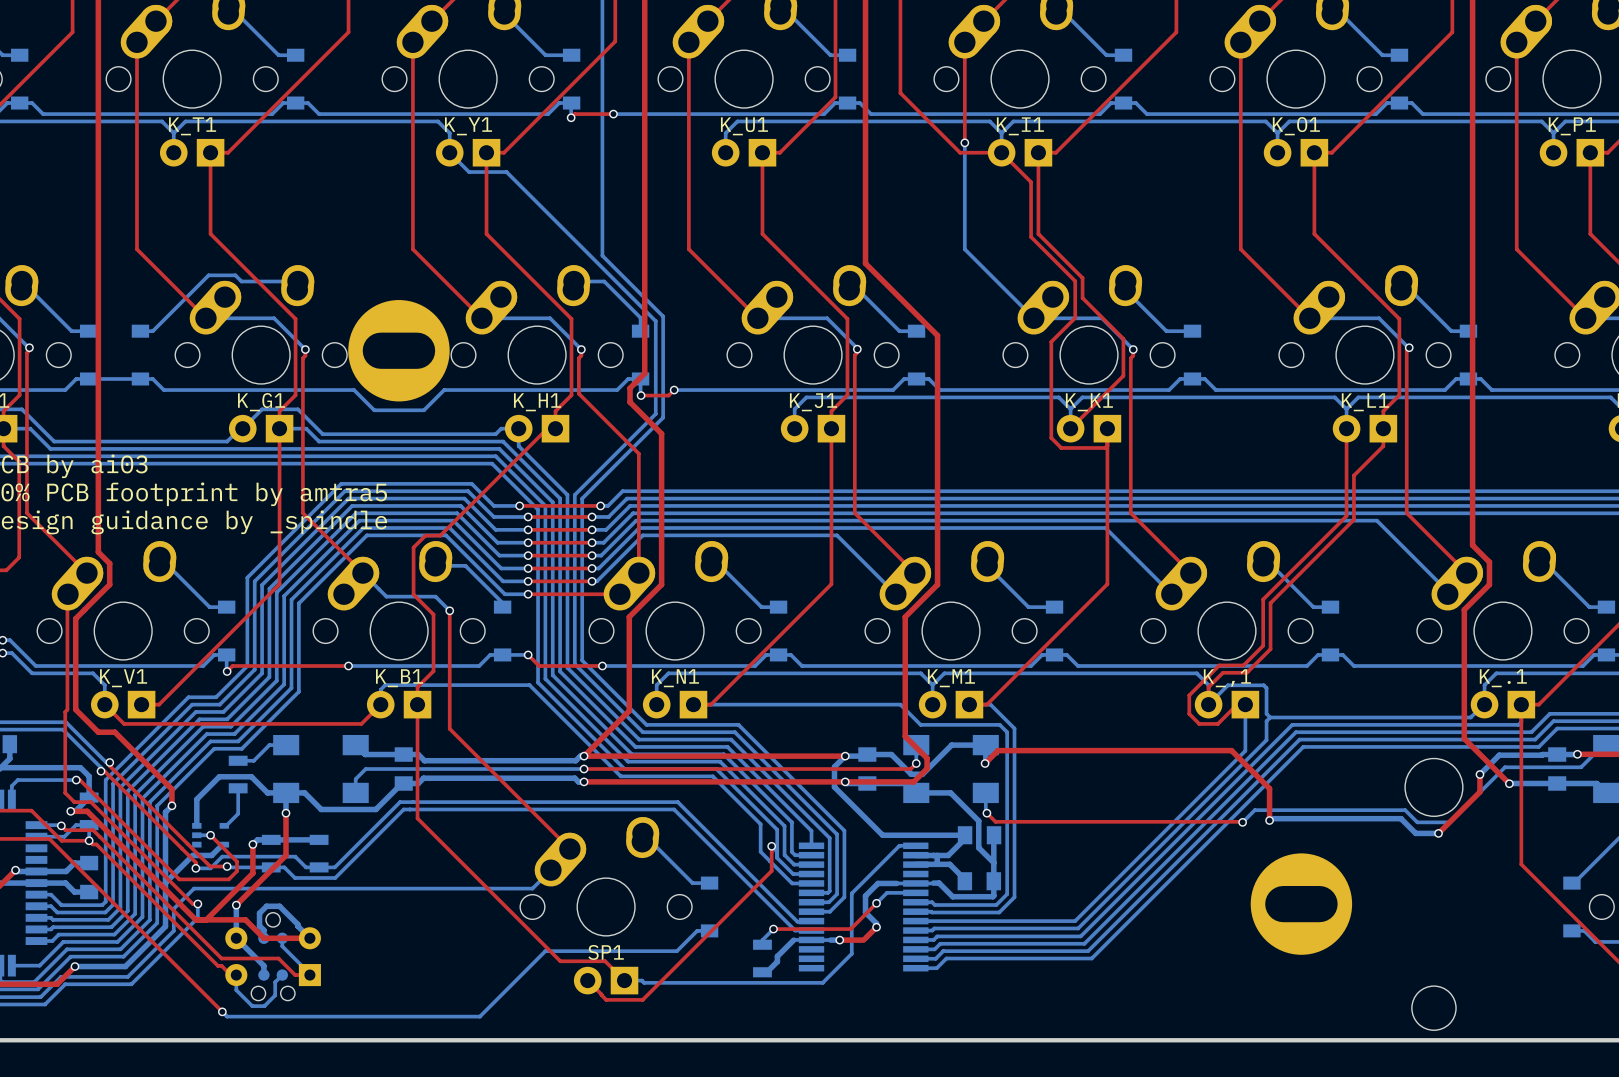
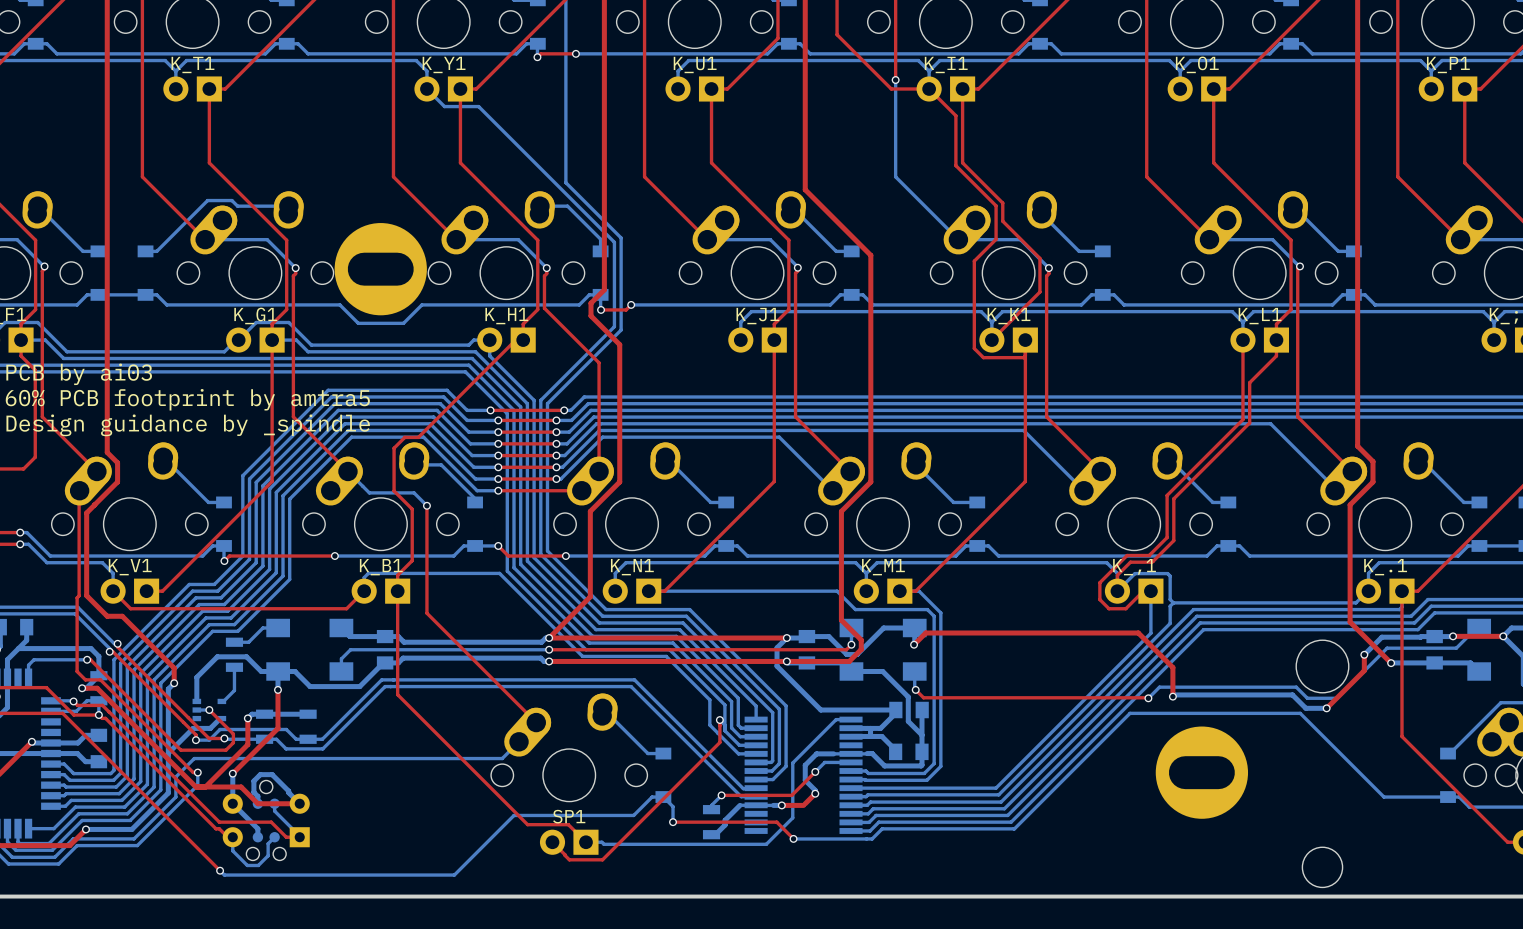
bottom track: none -> (663, 797) (673, 806) (673, 822)
bottom track: none -> (1448, 797) (1383, 797) (1300, 713) (1129, 713) (1014, 828) (882, 828) (872, 838) (793, 838)
top track: none -> (673, 822) (776, 822) (793, 838)
via: none -> (673, 822)
via: none -> (793, 838)

